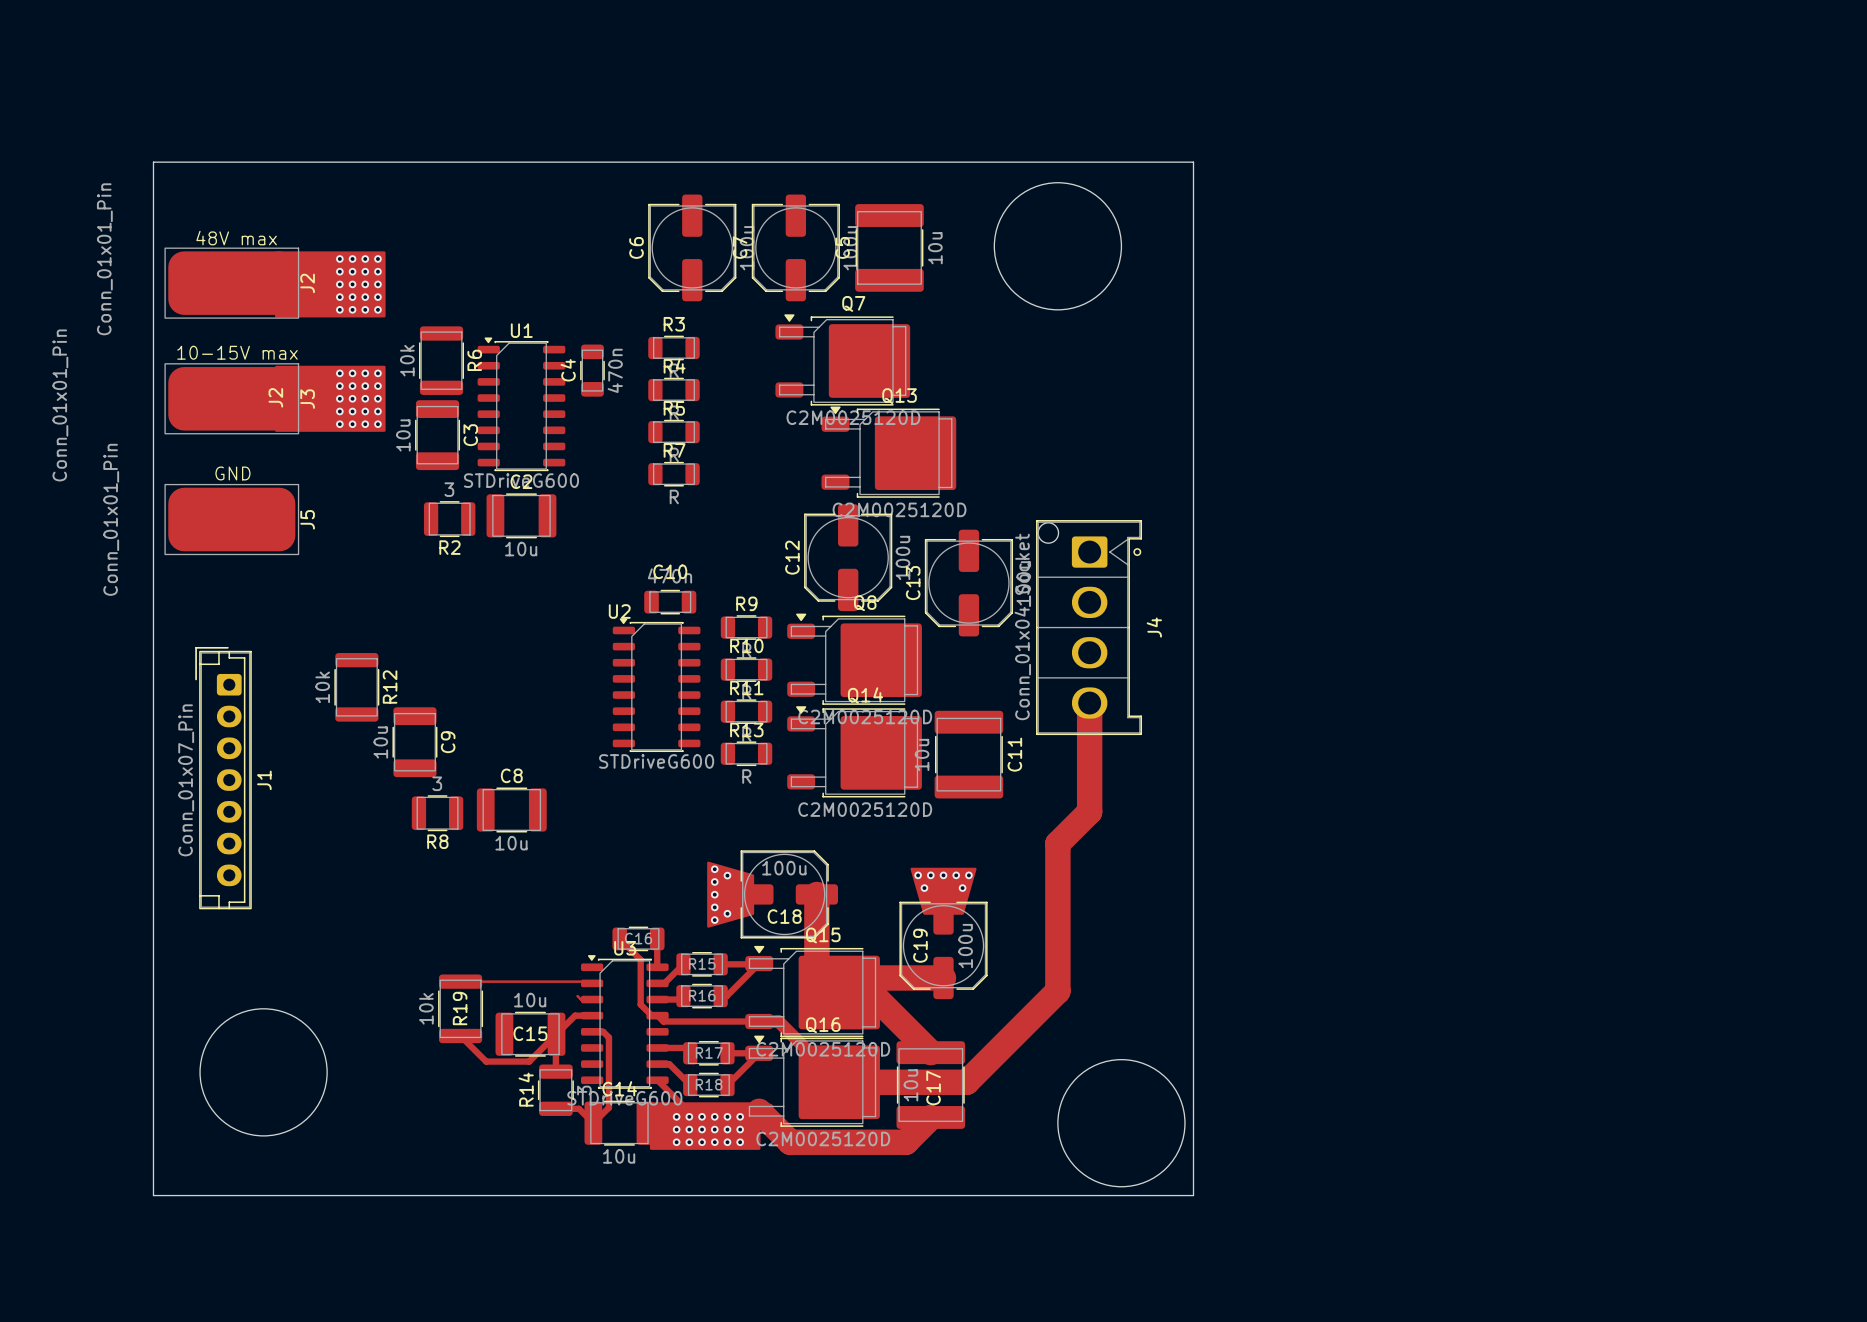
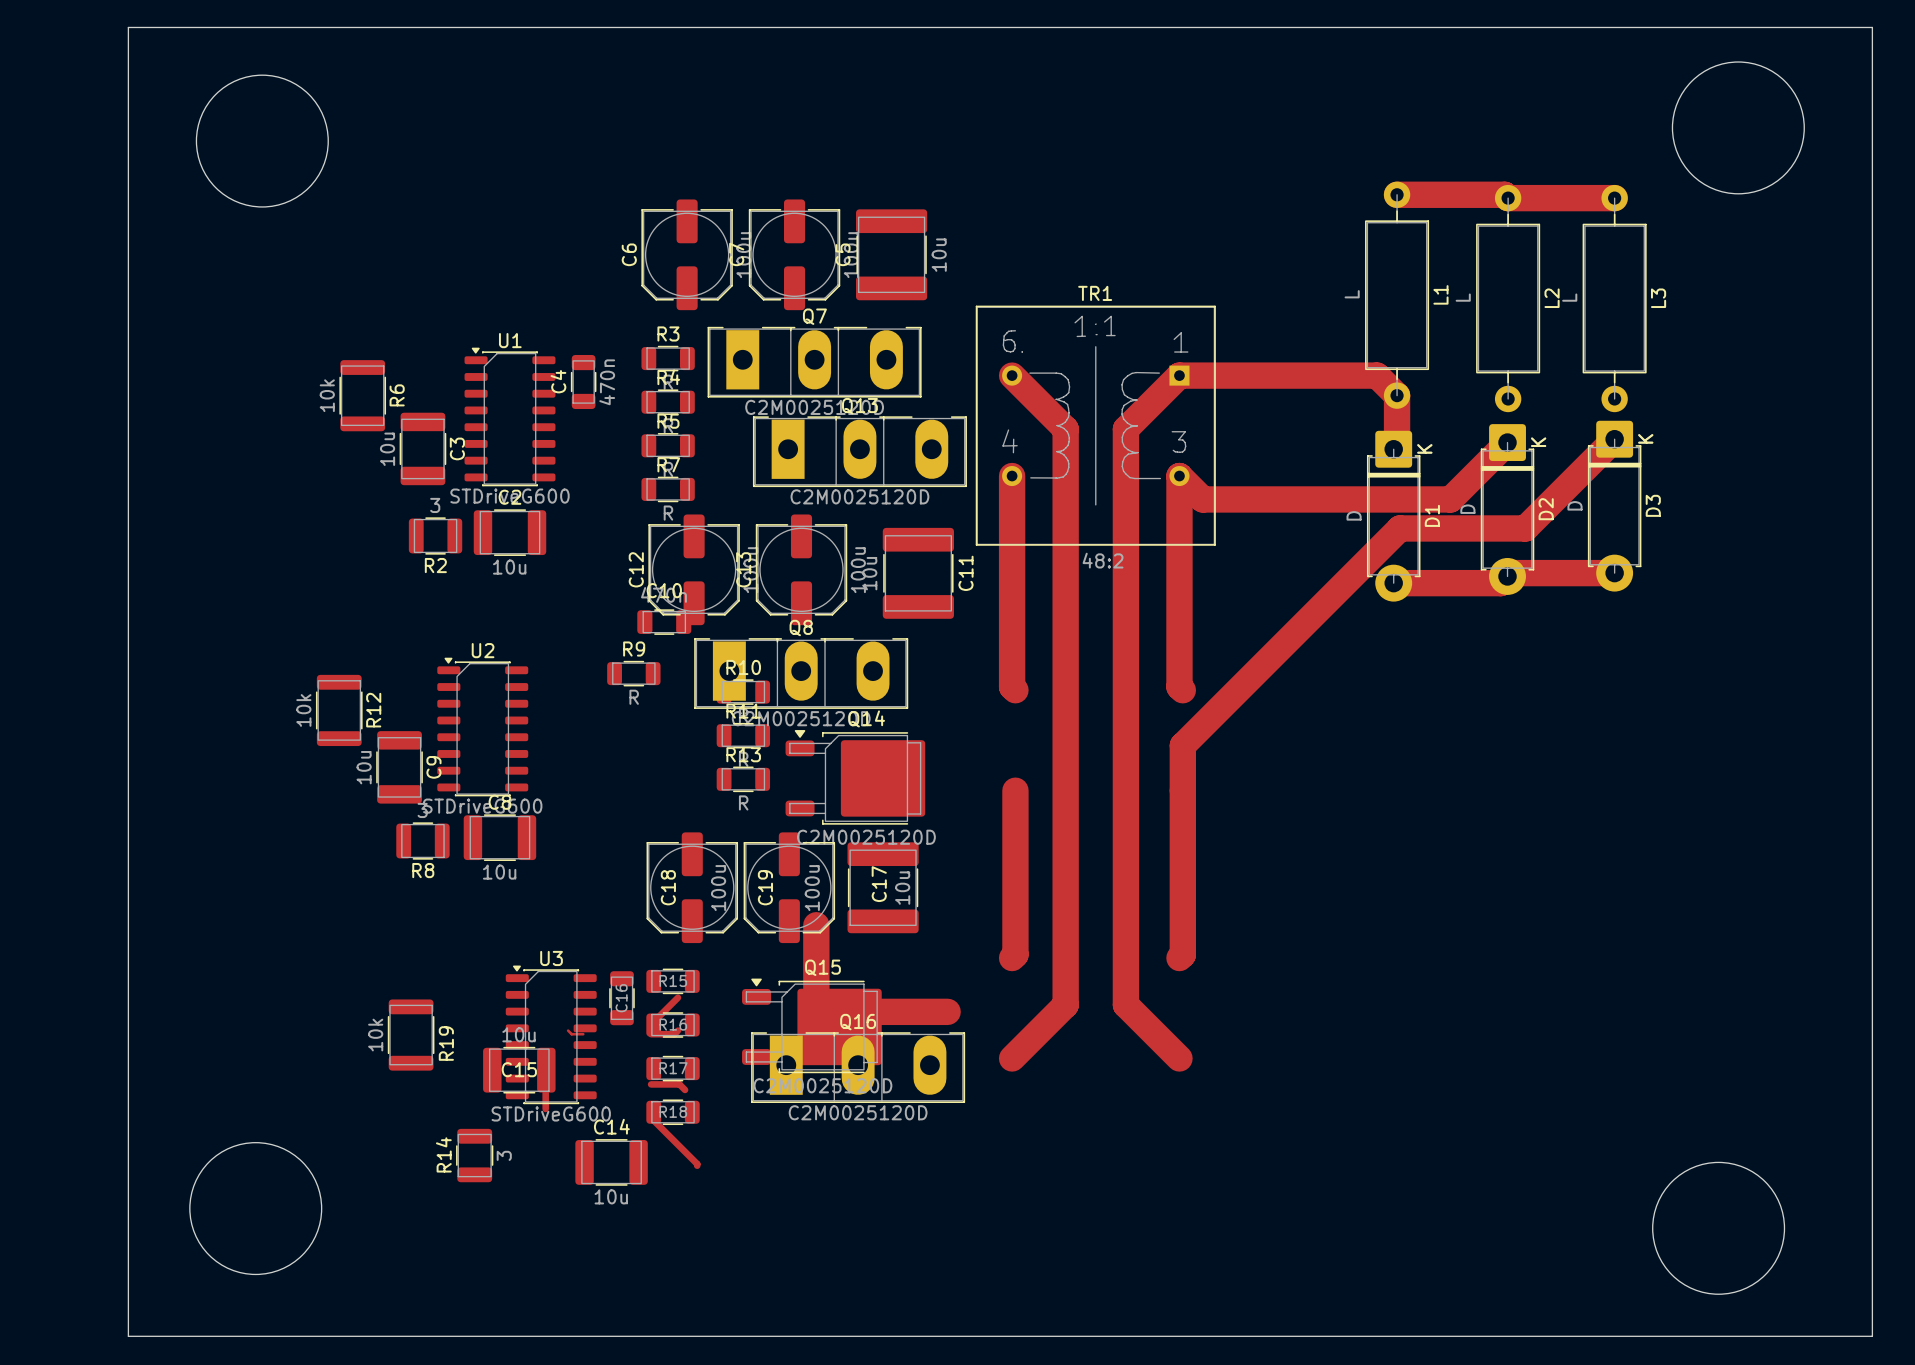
round board edge: none -> [1672, 61, 1805, 195]
round board edge: none -> [196, 74, 329, 208]
board edge: (153, 162) (1193, 162) (1193, 1195) (153, 1195) -> (128, 165) (128, 27) (1872, 27) (1872, 1336) (128, 1336) (128, 1237)
round board edge: [994, 182, 1122, 311] -> none
track: none -> (1397, 194) (1504, 194) (1508, 198) (1614, 198)
text: 48V max (236, 238) -> none
drawing: [275, 251, 386, 318] -> none
via: (339, 258) -> none
via: (352, 258) -> none
via: (365, 258) -> none
via: (377, 258) -> none
via: (339, 271) -> none
via: (352, 271) -> none
via: (365, 271) -> none
via: (377, 271) -> none
J2: Conn_01x01_Pin (231, 283) -> none
via: (339, 284) -> none
via: (352, 284) -> none
via: (365, 284) -> none
via: (377, 284) -> none
L1: none -> L (1397, 295)
L2: none -> L (1508, 298)
L3: none -> L (1614, 298)
via: (339, 297) -> none
via: (352, 297) -> none
via: (365, 297) -> none
via: (377, 297) -> none
via: (339, 309) -> none
via: (352, 309) -> none
via: (365, 309) -> none
via: (377, 309) -> none
Q7 footprint: [775, 314, 911, 406] -> [707, 326, 922, 398]
text: 10-15V max (237, 352) -> none
R6 position: (441, 360) -> (362, 395)
track: none -> (1012, 375) (1065, 429) (1065, 1004) (1012, 1058)
drawing: [275, 365, 386, 432] -> none
via: (339, 373) -> none
via: (352, 373) -> none
via: (365, 373) -> none
via: (377, 373) -> none
via: (339, 386) -> none
via: (352, 386) -> none
via: (365, 386) -> none
via: (377, 386) -> none
text: J2 (275, 397) -> none
J3: Conn_01x01_Pin (231, 398) -> none
via: (339, 398) -> none
via: (352, 398) -> none
via: (365, 398) -> none
via: (377, 398) -> none
Q13 footprint: [821, 406, 957, 498] -> [752, 416, 967, 488]
via: (339, 411) -> none
via: (352, 411) -> none
via: (365, 411) -> none
via: (377, 411) -> none
TR1: none -> 48:2 (1095, 425)
via: (339, 424) -> none
via: (352, 424) -> none
via: (365, 424) -> none
via: (377, 424) -> none
track: none -> (1614, 439) (1525, 528) (1399, 528) (1182, 745) (1182, 954) (1179, 958)
track: none -> (1507, 442) (1450, 499) (1202, 499) (1179, 476) (1179, 686) (1182, 690)
track: none -> (1393, 449) (1397, 445) (1397, 395) (1377, 375) (1179, 375) (1125, 429) (1125, 1004) (1179, 1058)
track: none -> (1012, 476) (1012, 686) (1015, 690)
text: GND (232, 473) -> none
D3: none -> D (1614, 506)
D2: none -> D (1507, 509)
D1: none -> D (1393, 516)
J5: Conn_01x01_Pin (231, 519) -> none
track: none -> (1614, 573) (1510, 573) (1500, 583) (1393, 583)
C12 position: (848, 557) -> (694, 569)
C13 position: (968, 583) -> (801, 569)
U2 name position: U2 (619, 611) -> U2 (483, 650)
Q8 footprint: [787, 613, 922, 705] -> [694, 638, 909, 709]
R9 position: (746, 627) -> (633, 673)
J4: Conn_01x04_Socket (1089, 627) -> none
U2 position: (656, 685) -> (482, 727)
track: (1089, 703) (1089, 811) (1057, 843) (1057, 991) (966, 1082) (832, 1082) -> none
C11 position: (968, 754) -> (918, 573)
track: none -> (1015, 790) (1015, 954) (1012, 958)
J1: Conn_01x07_Pin (223, 778) -> none
drawing: [707, 861, 755, 928] -> none
drawing: [910, 867, 977, 915] -> none
via: (714, 869) -> none
via: (727, 875) -> none
via: (918, 875) -> none
via: (930, 875) -> none
via: (943, 875) -> none
via: (956, 875) -> none
via: (968, 875) -> none
via: (714, 881) -> none
via: (924, 888) -> none
via: (962, 888) -> none
via: (714, 894) -> none
C18 rotation: 0° (784, 894) -> 90° clockwise (692, 887)
C18 position: (784, 894) -> (692, 887)
via: (714, 907) -> none
via: (727, 913) -> none
via: (714, 920) -> none
track: (619, 938) (640, 959) (640, 1004) (651, 1015) (657, 1015) (663, 1021) (778, 1021) (839, 1082) -> none
C16 rotation: 0° (638, 938) -> 90° clockwise (621, 998)
track: (657, 938) (657, 967) -> none
C19 position: (943, 945) -> (789, 887)
track: (759, 963) (726, 996) (720, 996) -> none
R15 position: (702, 964) -> (673, 981)
track: (720, 964) (758, 964) -> none
track: (460, 981) (590, 981) (592, 983) -> none
track: (839, 992) (870, 992) (930, 1052) -> none
R16 position: (702, 996) -> (673, 1025)
R19 position: (460, 1008) -> (411, 1035)
track: (592, 1015) (575, 1015) (529, 1061) (486, 1061) (460, 1035) -> none
U3 position: (624, 1021) -> (551, 1034)
track: (592, 1031) (603, 1031) (608, 1037) (608, 1107) (593, 1123) (579, 1108) (555, 1108) -> none
Q16 footprint: [745, 1035, 880, 1127] -> [751, 1032, 966, 1103]
R17 position: (708, 1053) -> (673, 1068)
track: (727, 1053) (759, 1053) (727, 1085) -> none
round board edge: [1057, 1059, 1186, 1188] -> none
track: (657, 1064) (669, 1064) (690, 1085) -> none
round board edge position: (263, 1072) -> (255, 1208)
R18 position: (708, 1085) -> (673, 1112)
C17 value position: 10u (910, 1085) -> 10u (902, 888)
C17 position: (930, 1085) -> (883, 887)
C17 name position: C17 (933, 1087) -> C17 (879, 884)
R14 position: (555, 1090) -> (474, 1155)
drawing: [649, 1102, 761, 1150] -> none
track: (759, 1111) (790, 1142) (906, 1142) (930, 1117) -> none
via: (676, 1116) -> none
via: (689, 1116) -> none
via: (702, 1116) -> none
via: (714, 1116) -> none
via: (727, 1116) -> none
via: (740, 1116) -> none
round board edge: none -> [1652, 1162, 1785, 1295]
via: (676, 1129) -> none
via: (689, 1129) -> none
via: (702, 1129) -> none
via: (714, 1129) -> none
via: (727, 1129) -> none
via: (740, 1129) -> none
via: (676, 1142) -> none
via: (689, 1142) -> none
via: (702, 1142) -> none
via: (714, 1142) -> none
via: (727, 1142) -> none
via: (740, 1142) -> none

